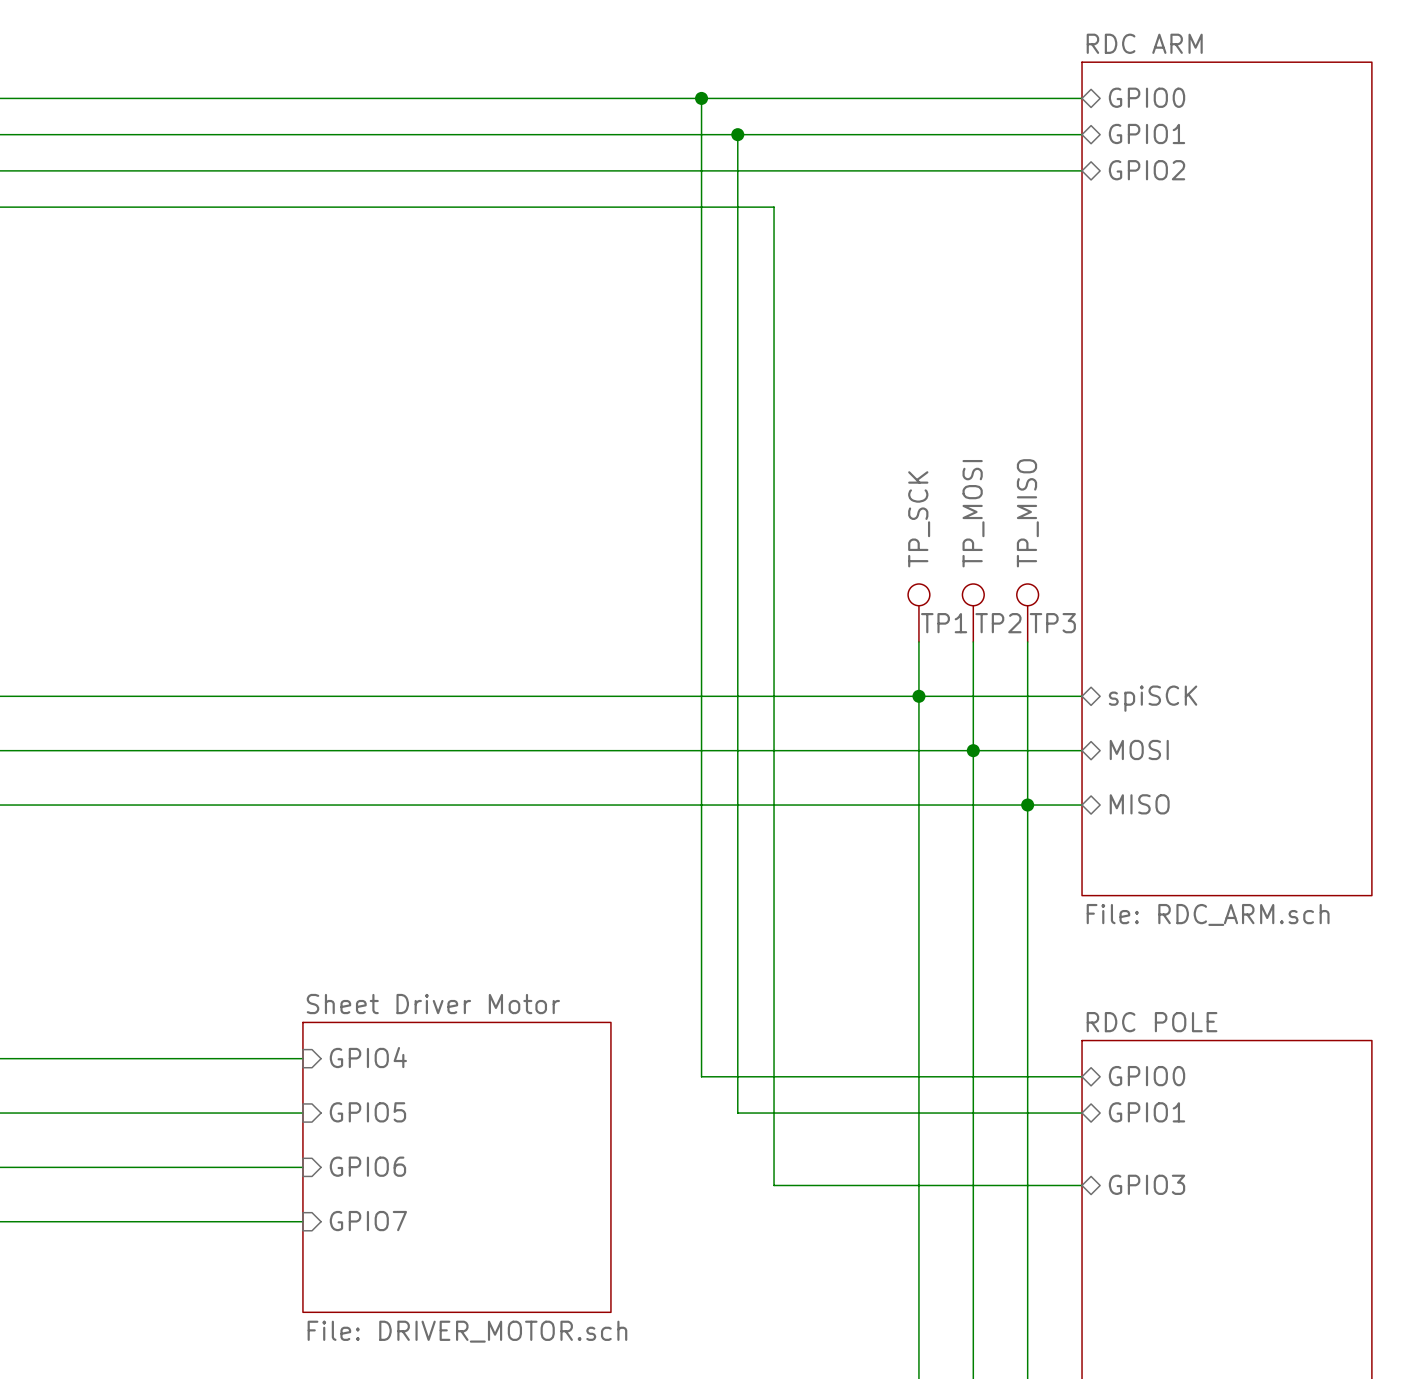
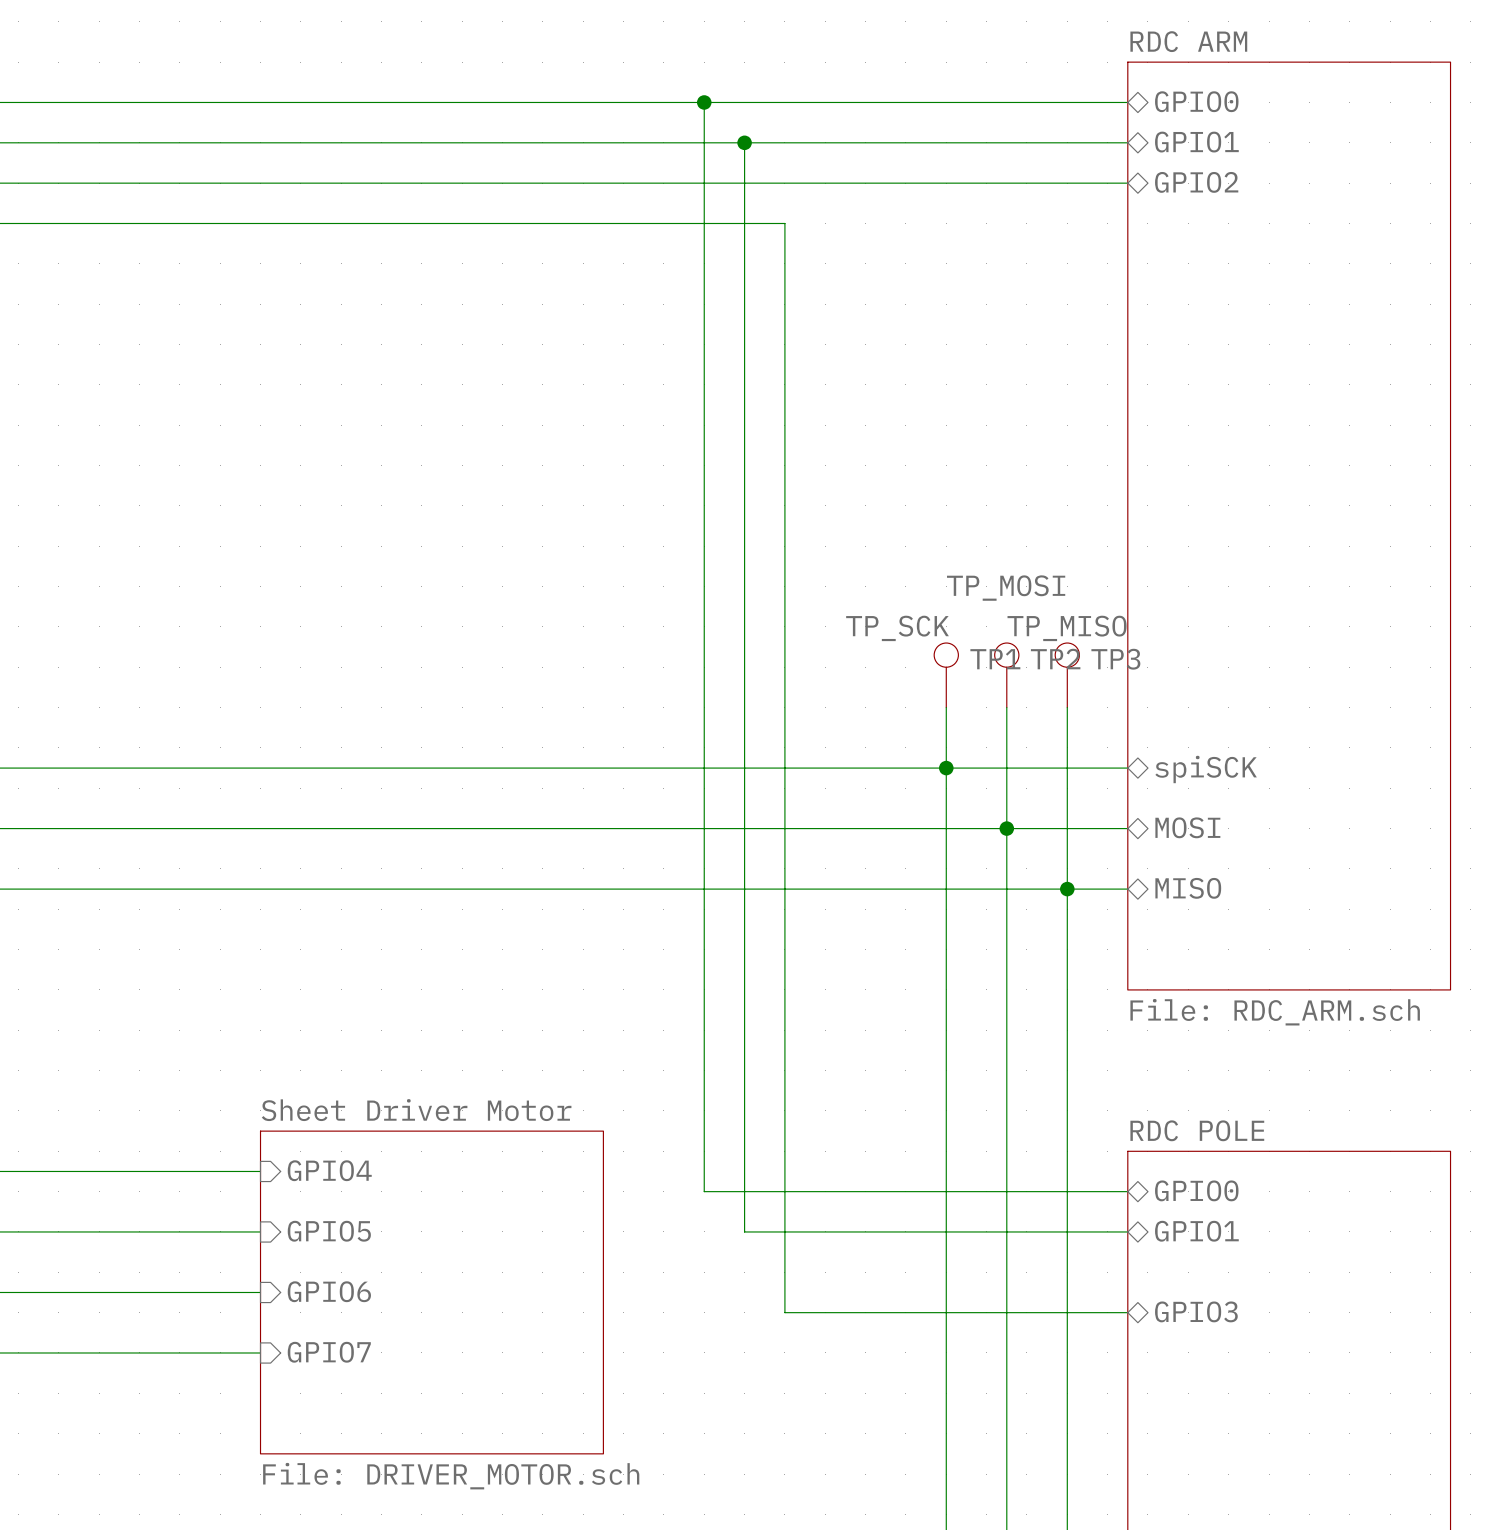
TP2 value rotation: 0° (973, 513) -> 90° clockwise (1006, 588)
TP3 value rotation: 0° (1027, 513) -> 90° clockwise (1067, 628)
TP1 value rotation: 0° (919, 519) -> 90° clockwise (897, 628)
TP1 name position: TP1 (944, 623) -> TP1 (995, 659)
TP2 name position: TP2 (998, 623) -> TP2 (1055, 659)
TP3 name position: TP3 (1052, 623) -> TP3 (1115, 659)

